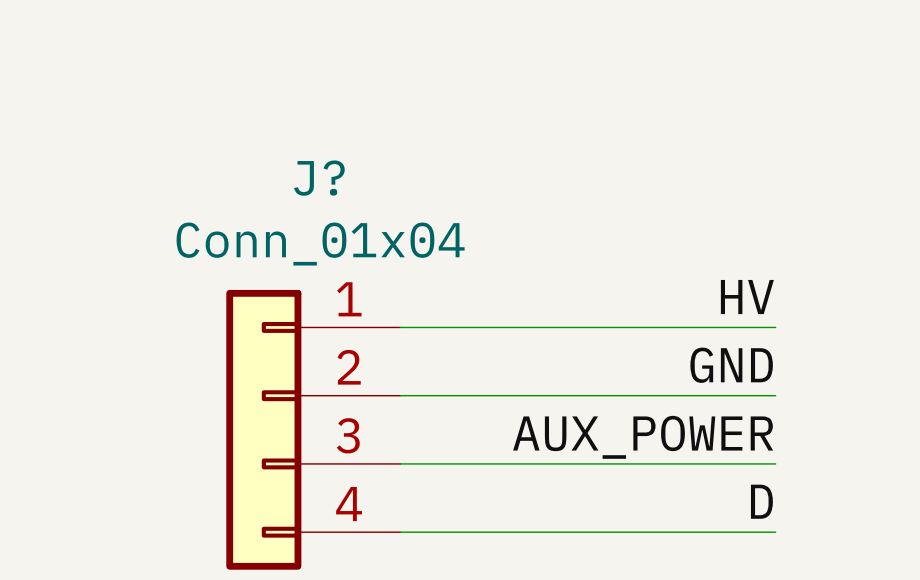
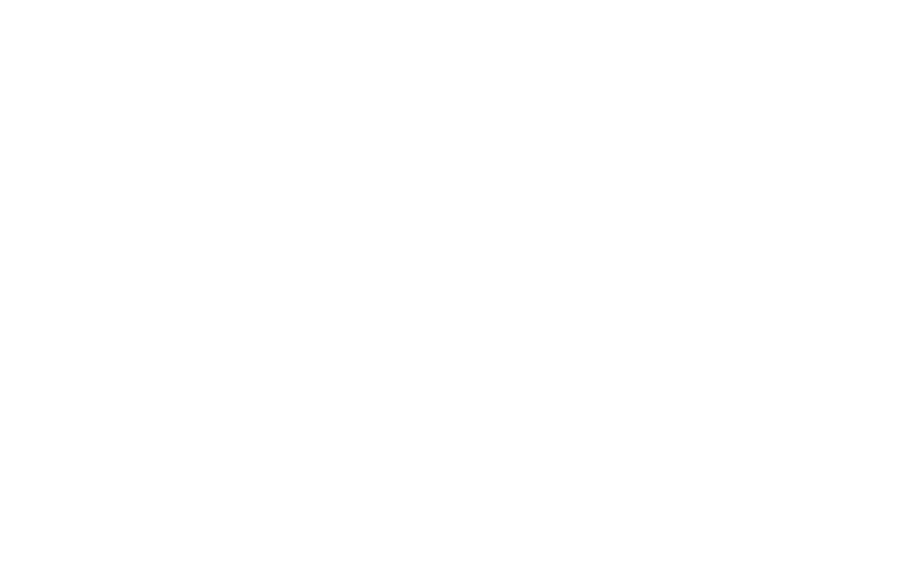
label: HV (747, 297) -> none
wire: (400, 327) (775, 327) -> none
label: GND (731, 365) -> none
wire: (400, 395) (775, 395) -> none
J?: Conn_01x04 (313, 429) -> none
label: AUX_POWER (643, 437) -> none
wire: (400, 463) (775, 463) -> none
label: D (761, 501) -> none
wire: (400, 532) (775, 532) -> none

